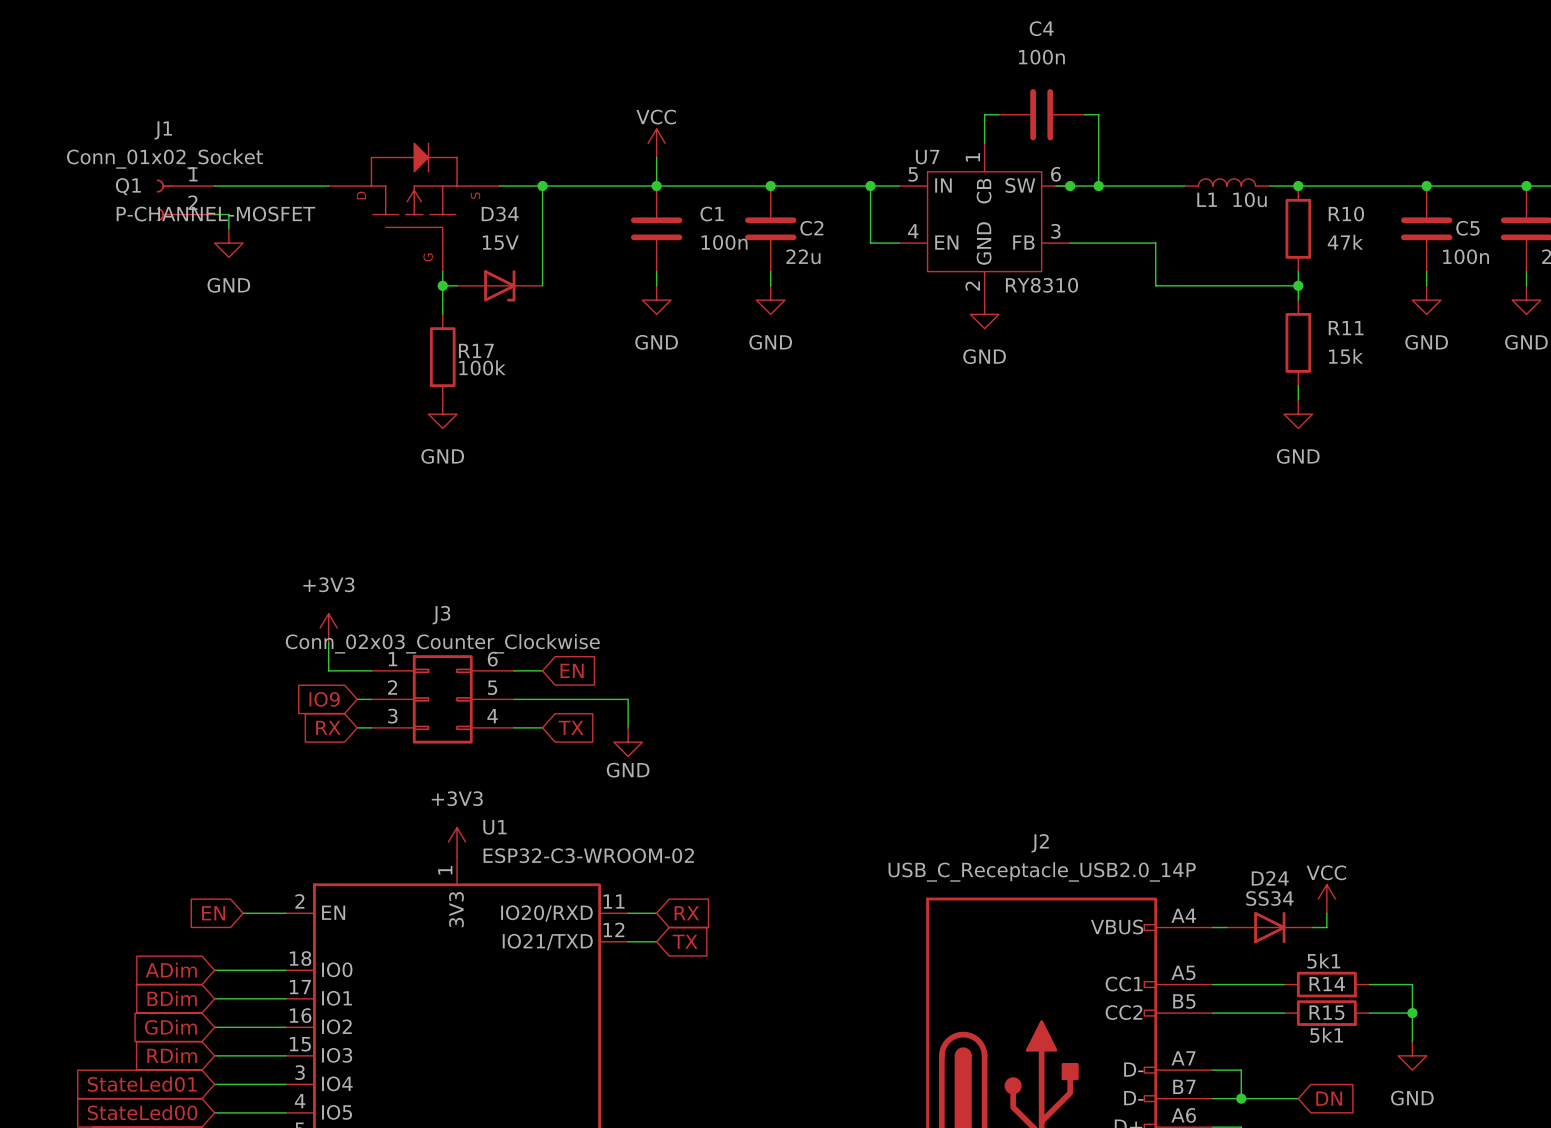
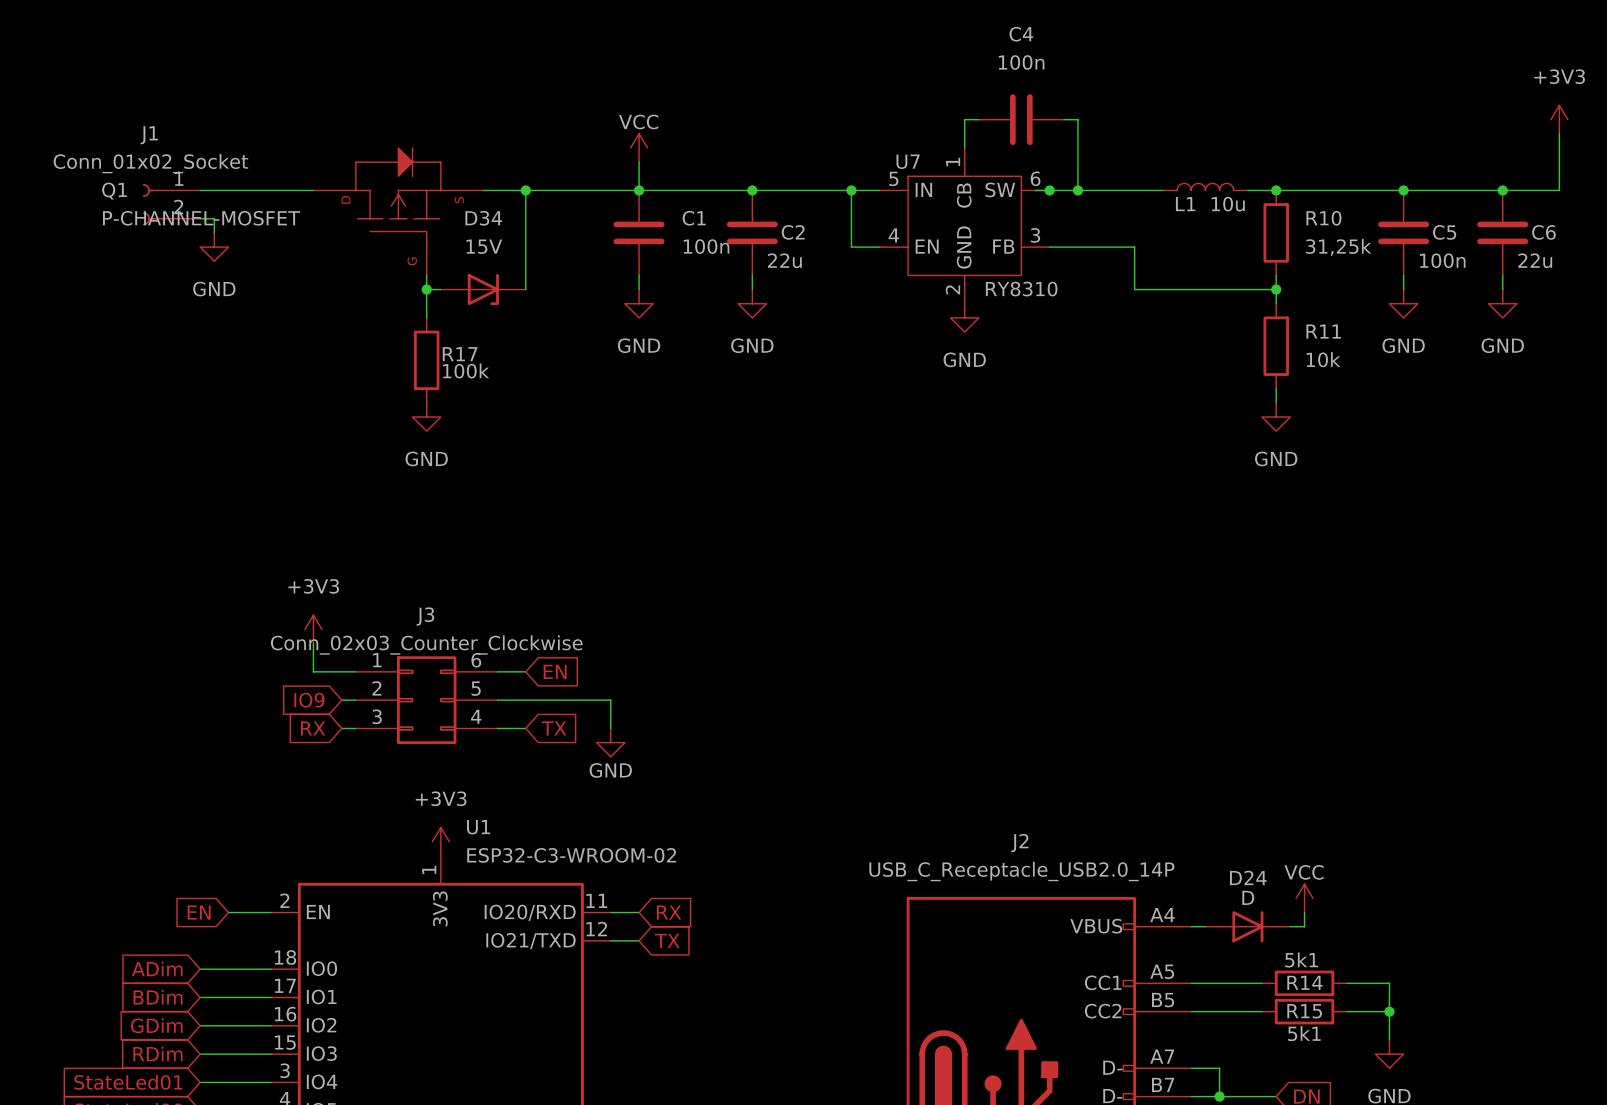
R10 value: 47k (1345, 242) -> 31,25k (1338, 247)
R11 value: 15k (1346, 356) -> 10k (1323, 359)
D24 value: SS34 (1269, 898) -> D (1248, 897)

